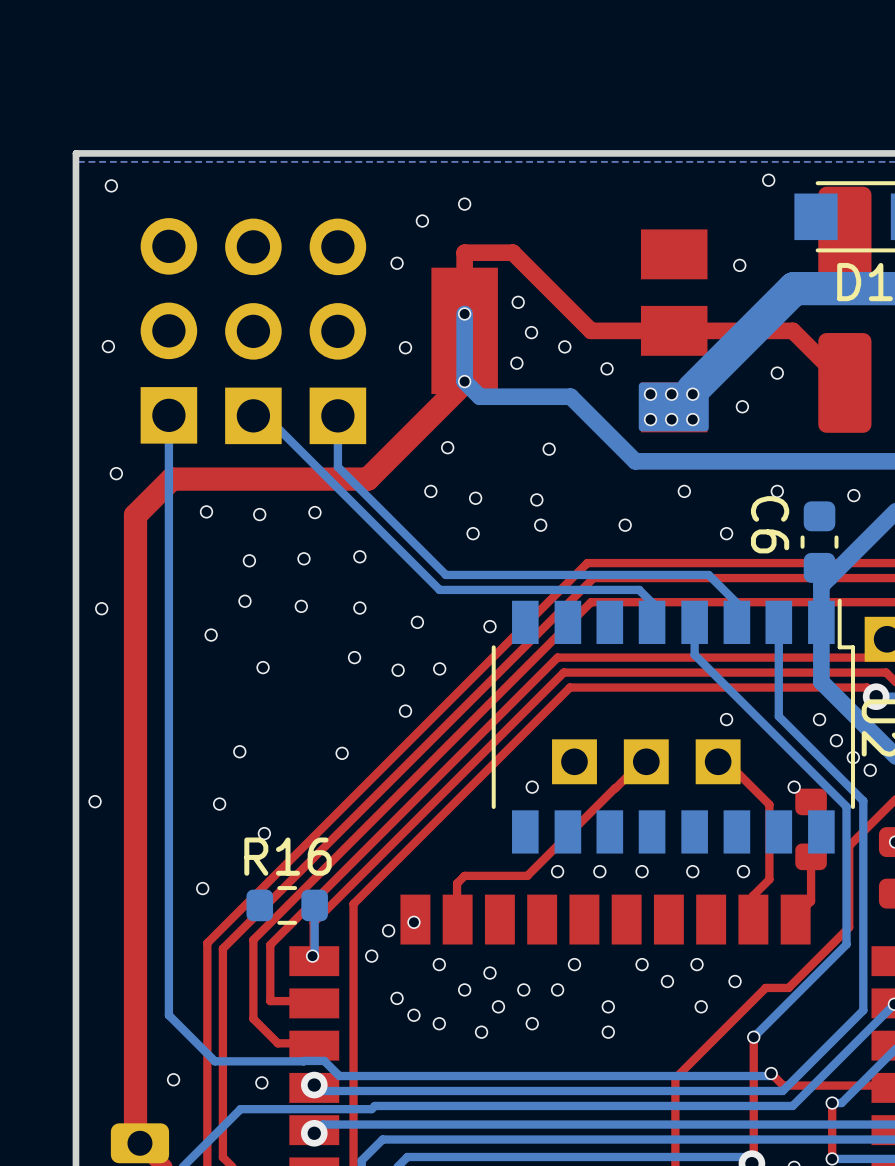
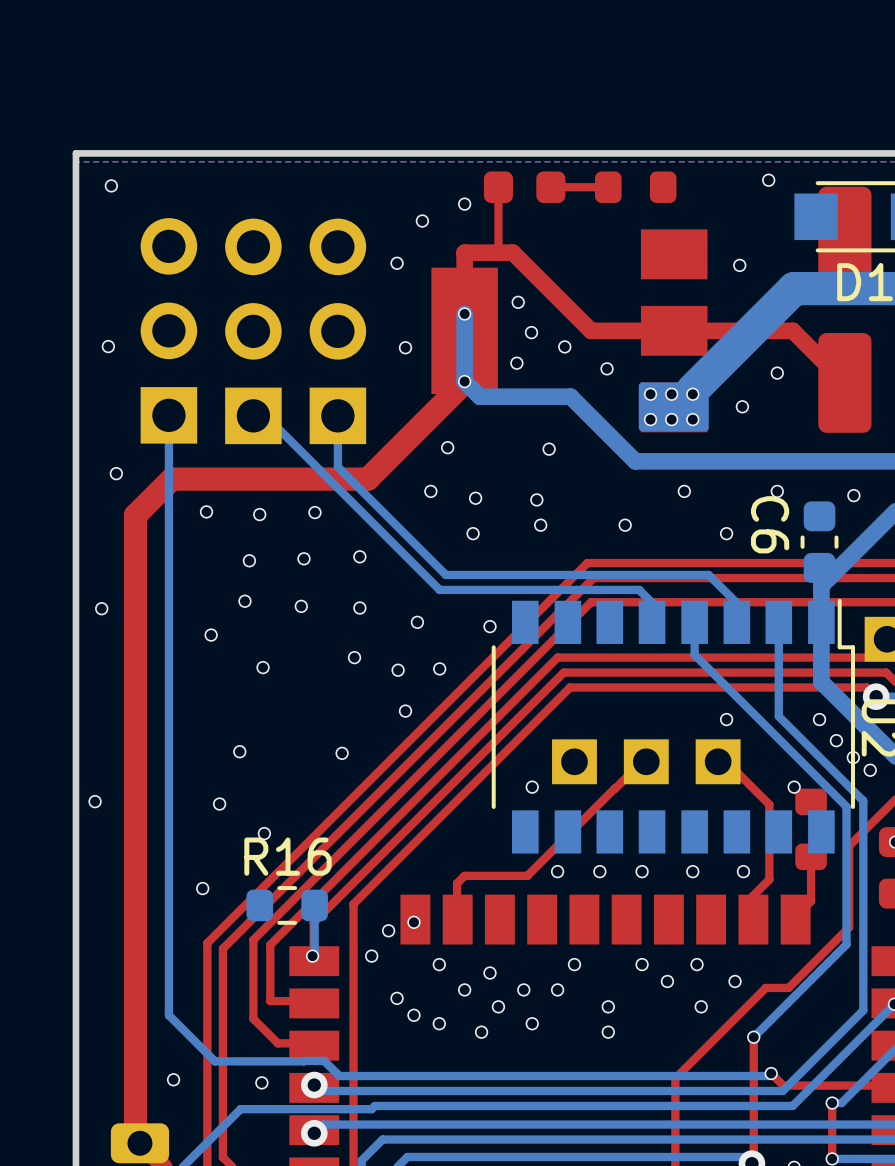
top track: none -> (498, 187) (498, 252)
part: none -> (524, 187)
top track: none -> (608, 187) (550, 187)
part: none -> (635, 187)

